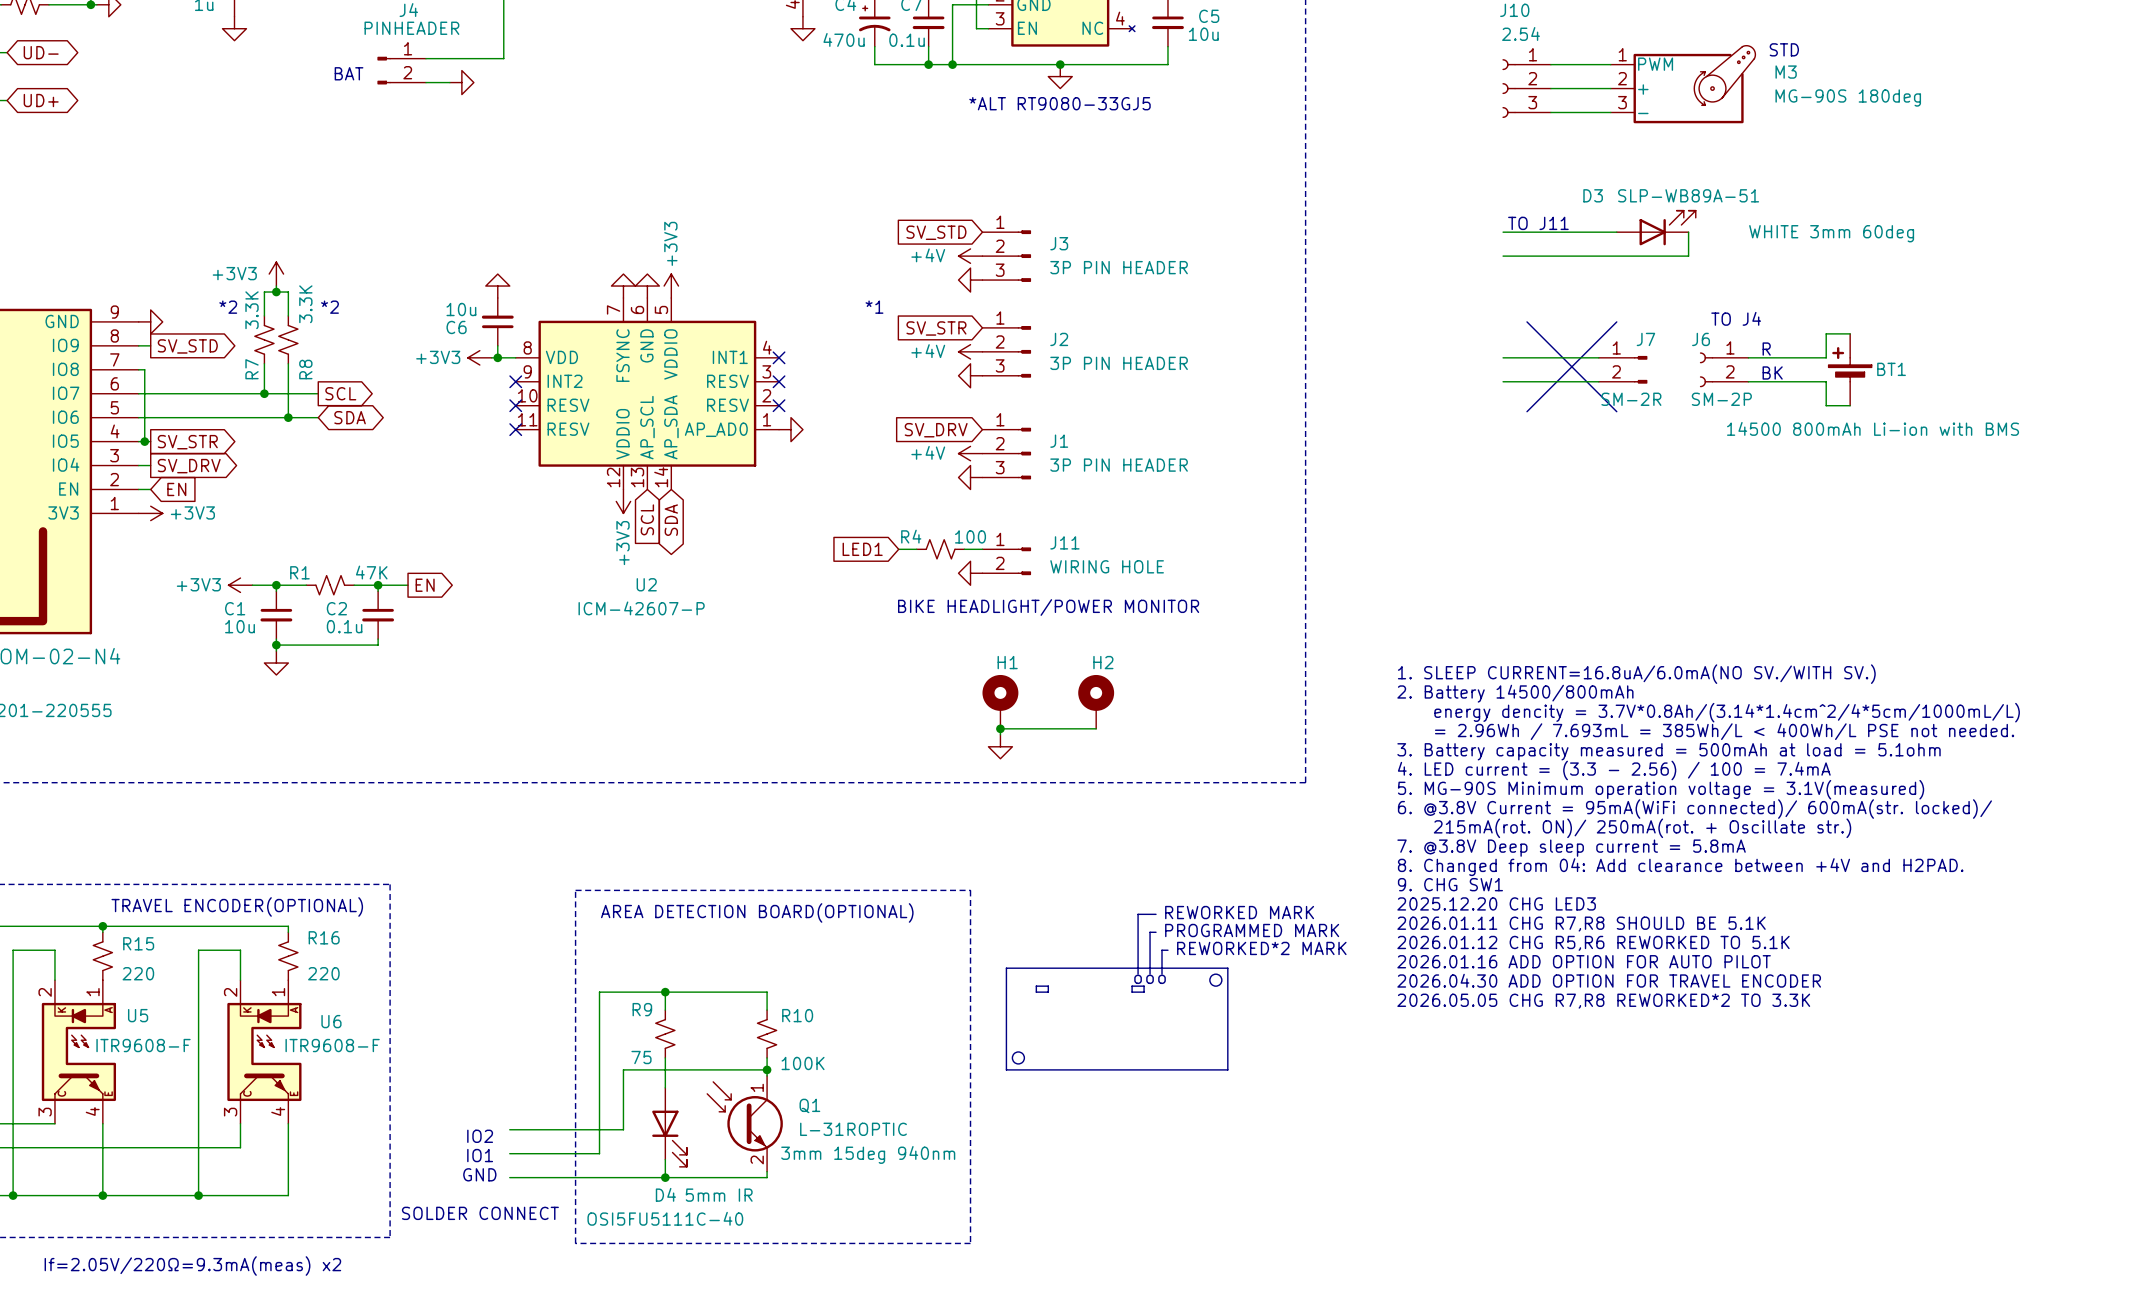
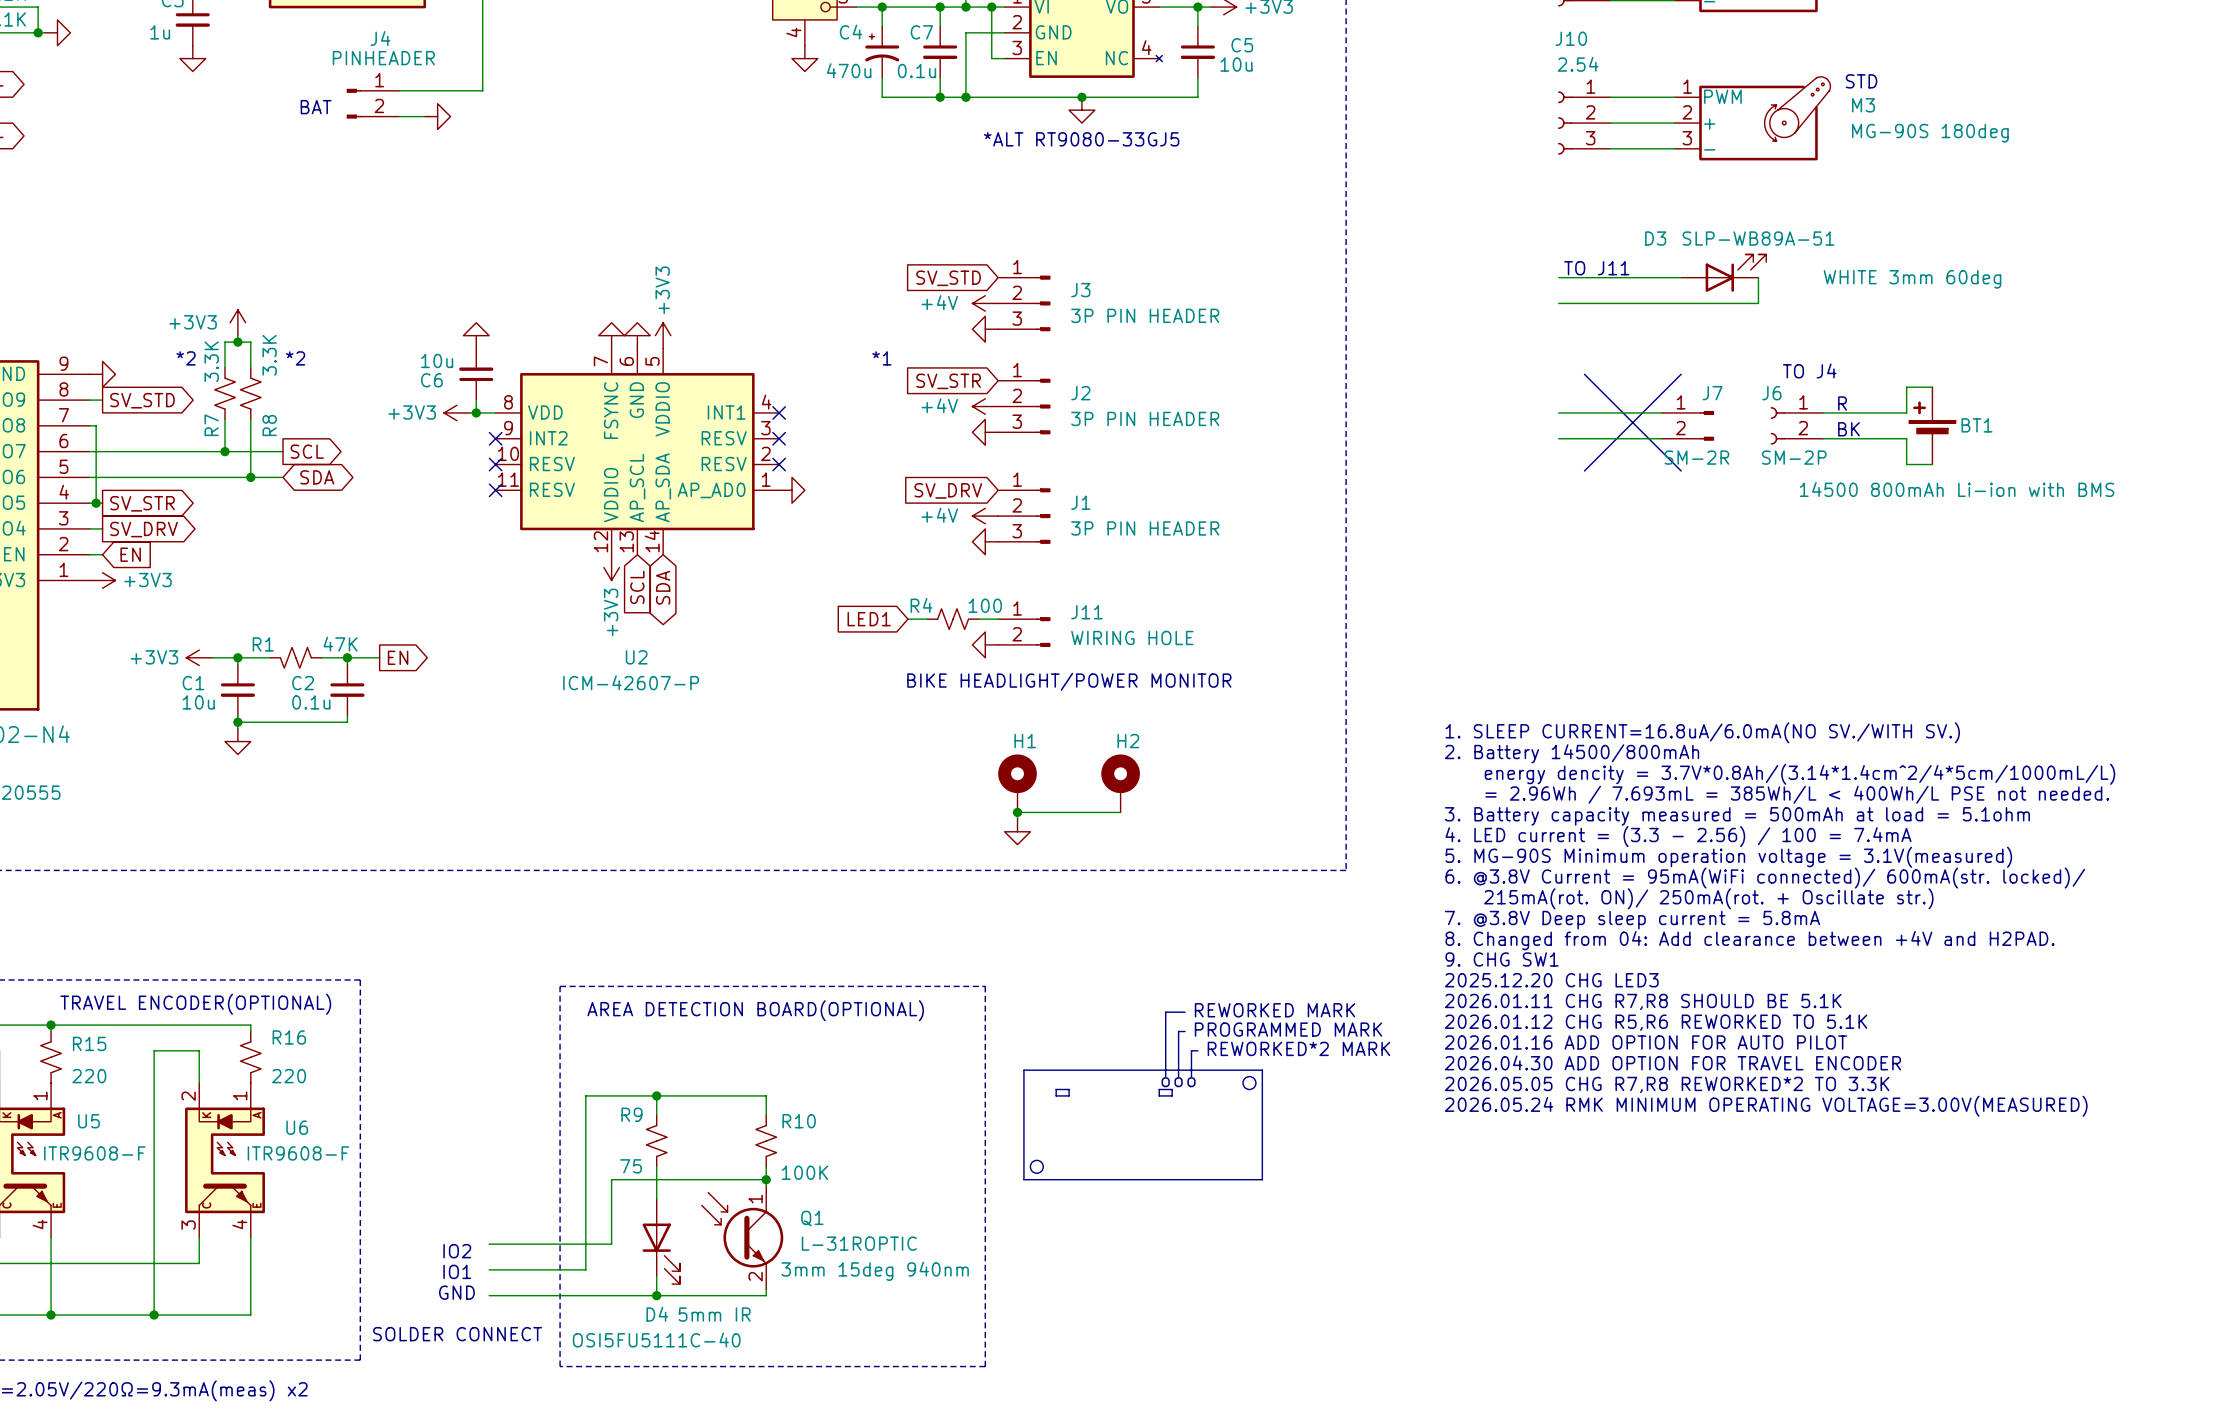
text: none -> 1. SLEEP CURRENT=16.8uA/6.0mA(NO SV./WITH SV.) (1702, 732)
text: 1. SLEEP CURRENT=16.8uA/6.0mA(NO SV./WITH SV.) (1636, 674) -> 2. Battery 14500/800mAh (1572, 753)
text: 2. Battery 14500/800mAh (1515, 693) -> energy dencity = 3.7V*0.8Ah/(3.14*1.4cm^2/4*5cm/1000mL/L) (1799, 774)
text: energy dencity = 3.7V*0.8Ah/(3.14*1.4cm^2/4*5cm/1000mL/L) (1727, 712) -> = 2.96Wh / 7.693mL = 385Wh/L < 400Wh/L PSE not needed. (1797, 794)
text: = 2.96Wh / 7.693mL = 385Wh/L < 400Wh/L PSE not needed. (1724, 731) -> 3. Battery capacity measured = 500mAh at load = 5.1ohm (1737, 816)
text: 3. Battery capacity measured = 500mAh at load = 5.1ohm (1669, 751) -> 4. LED current = (3.3 - 2.56) / 100 = 7.4mA (1678, 836)
text: 4. LED current = (3.3 - 2.56) / 100 = 7.4mA (1614, 770) -> 5. MG-90S Minimum operation voltage = 3.1V(measured) (1728, 857)
text: 5. MG-90S Minimum operation voltage = 3.1V(measured) (1661, 789) -> 6. @3.8V Current = 95mA(WiFi connected)/ 600mA(str. locked)/ (1765, 878)
text: 6. @3.8V Current = 95mA(WiFi connected)/ 600mA(str. locked)/ (1694, 809) -> 215mA(rot. ON)/ 250mA(rot. + Oscillate str.) (1708, 898)
text: 215mA(rot. ON)/ 250mA(rot. + Oscillate str.) (1642, 828) -> 7. @3.8V Deep sleep current = 5.8mA (1632, 920)
text: 7. @3.8V Deep sleep current = 5.8mA (1571, 848) -> 8. Changed from 04: Add clearance between +4V and H2PAD. (1749, 940)
text: 8. Changed from 04: Add clearance between +4V and H2PAD. (1680, 867) -> 9. CHG SW1 (1502, 959)
text: 9. CHG SW1 (1450, 884) -> 2025.12.20 CHG LED3 (1551, 980)
text: 2025.12.20 CHG LED3 (1496, 903) -> 2026.01.11 CHG R7,R8 SHOULD BE 5.1K (1643, 1001)
text: 2026.01.11 CHG R7,R8 SHOULD BE 5.1K (1581, 924) -> 2026.01.12 CHG R5,R6 REWORKED TO 5.1K (1656, 1022)
text: 2026.01.12 CHG R5,R6 REWORKED TO 5.1K (1593, 943) -> 2026.01.16 ADD OPTION FOR AUTO PILOT (1645, 1042)
text: 2026.01.16 ADD OPTION FOR AUTO PILOT (1584, 961) -> 2026.04.30 ADD OPTION FOR TRAVEL ENCODER (1672, 1062)
text: 2026.04.30 ADD OPTION FOR TRAVEL ENCODER (1609, 980) -> 2026.05.05 CHG R7,R8 REWORKED*2 TO 3.3K (1667, 1084)
text: 2026.05.05 CHG R7,R8 REWORKED*2 TO 3.3K (1603, 1001) -> 2026.05.24 RMK MINIMUM OPERATING VOLTAGE=3.00V(MEASURED) (1766, 1106)

